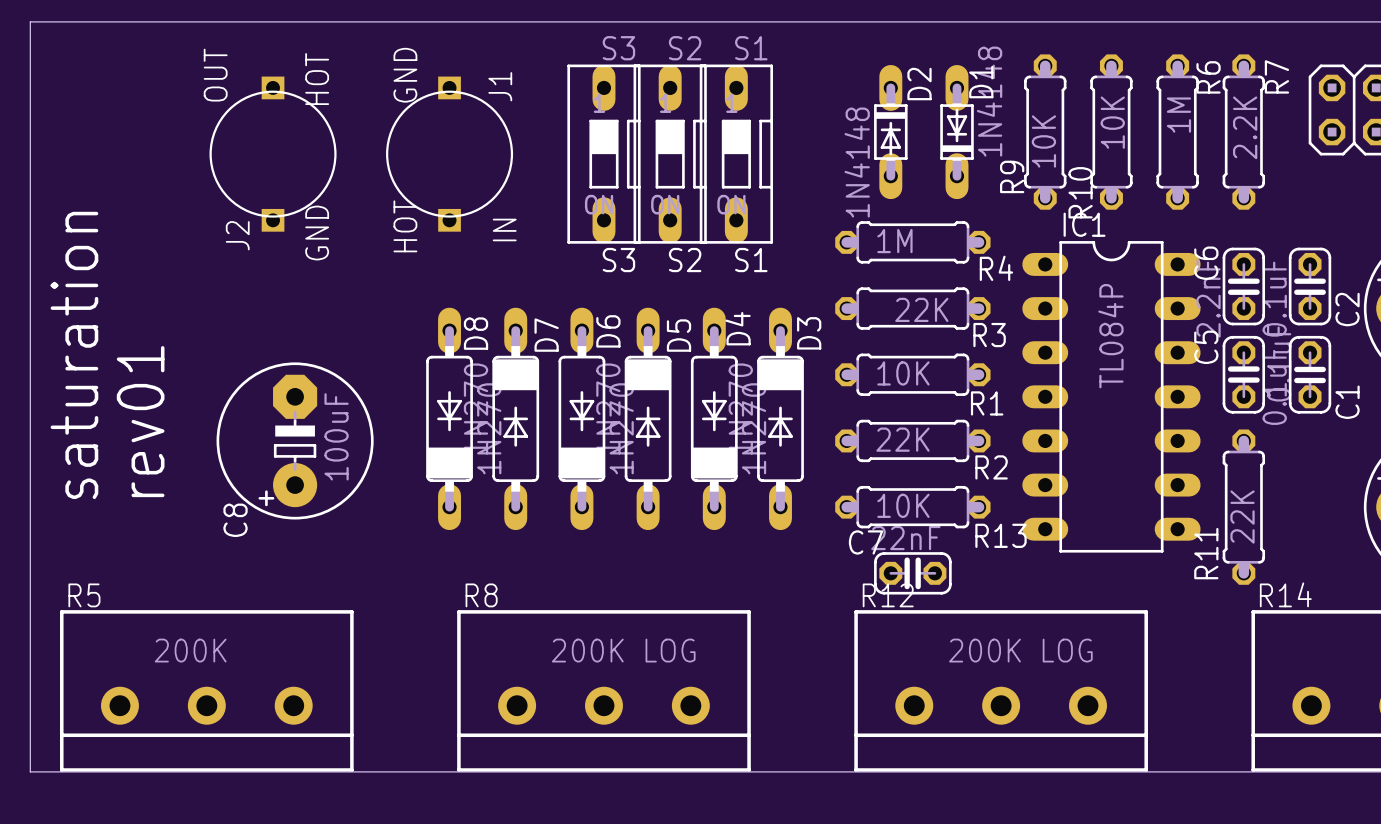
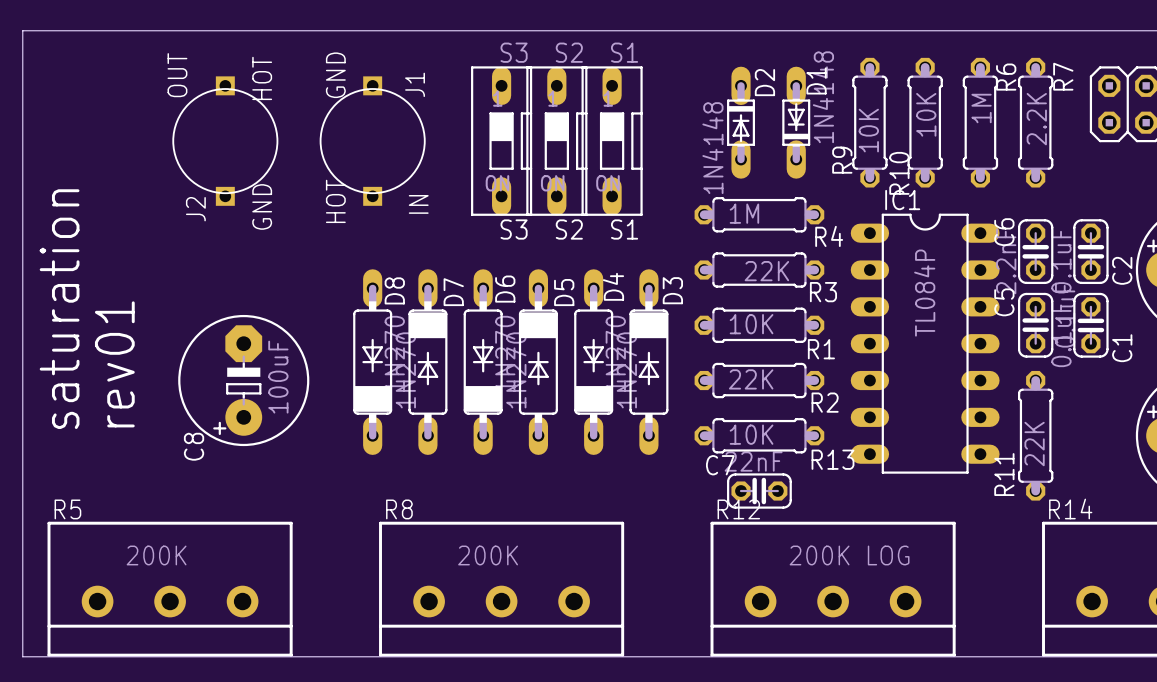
R8 value: 200K LOG (623, 650) -> 200K (488, 555)

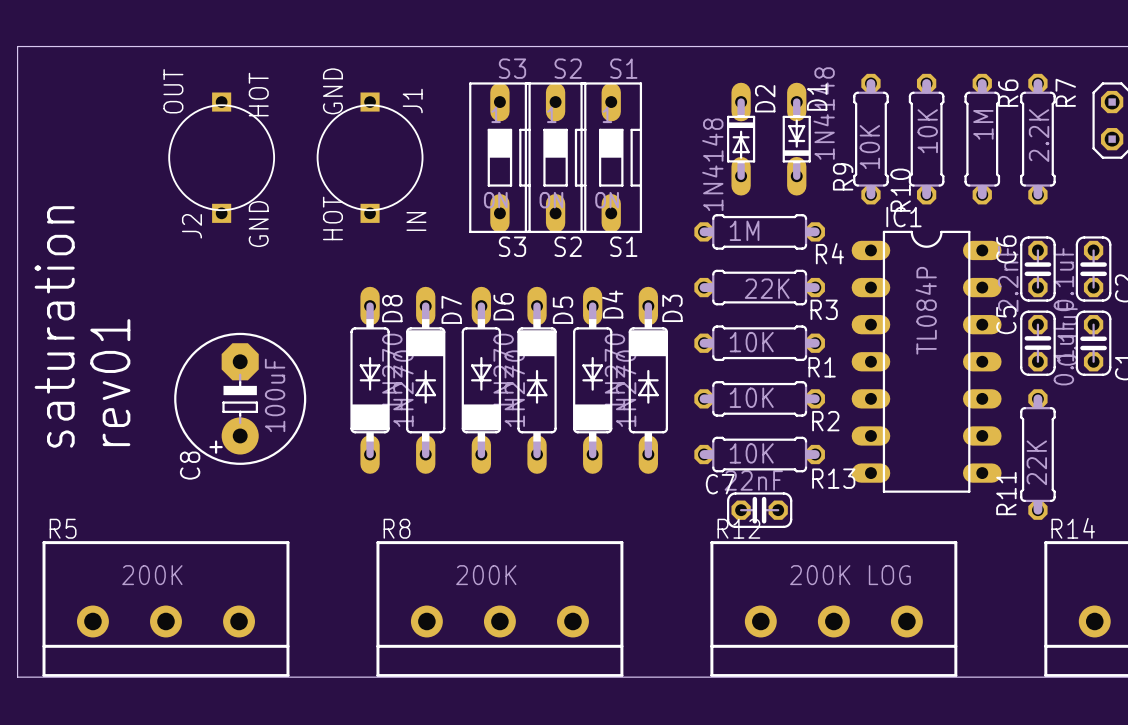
R2 value: 22K (751, 379) -> 10K (751, 397)

